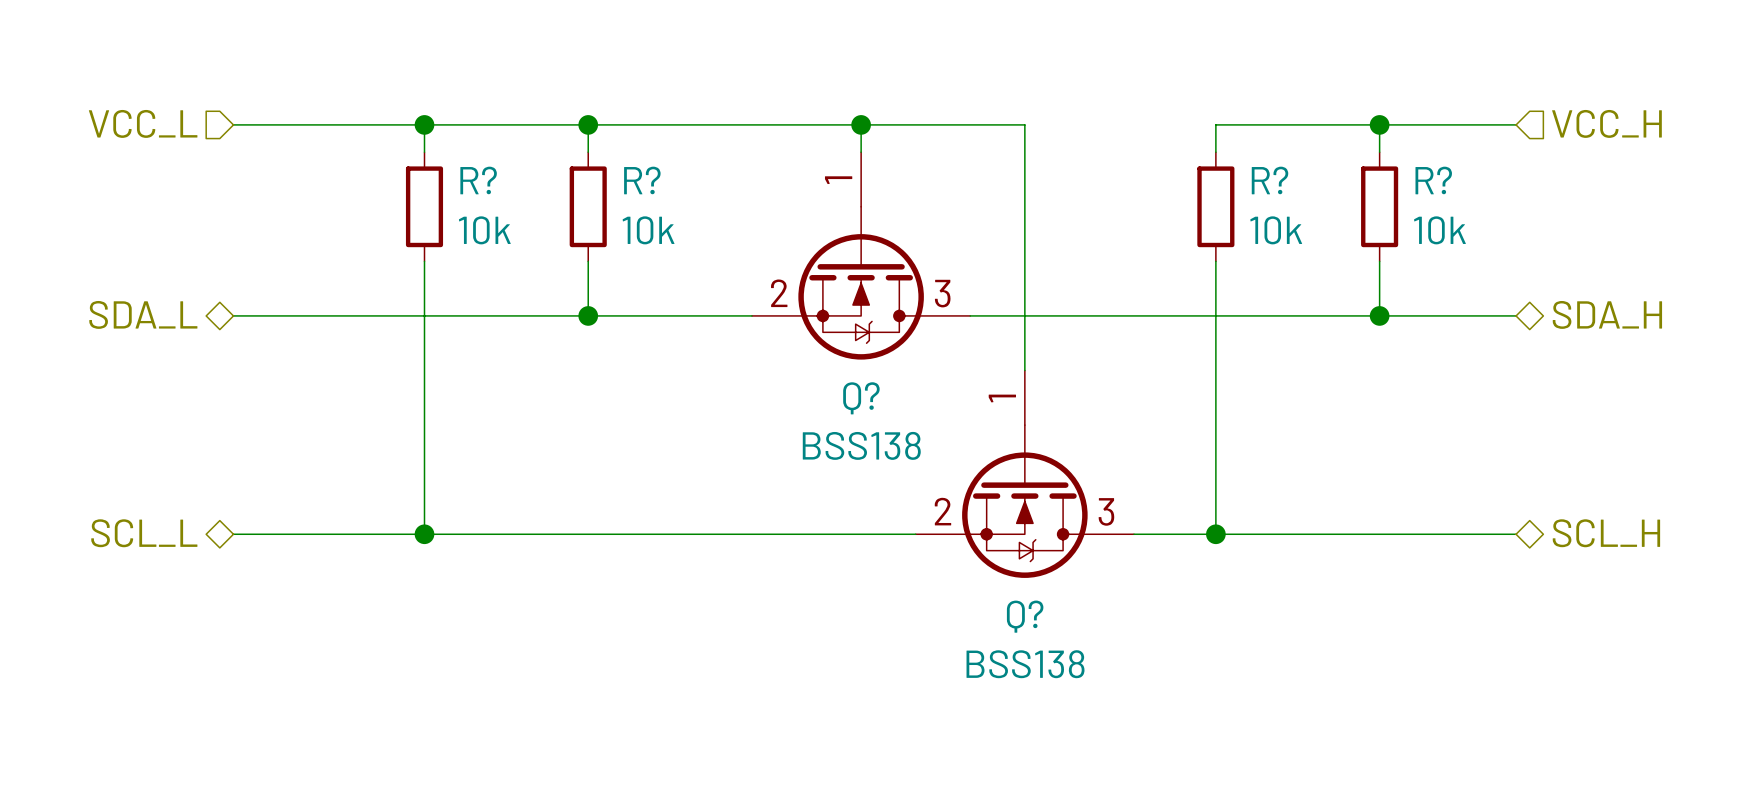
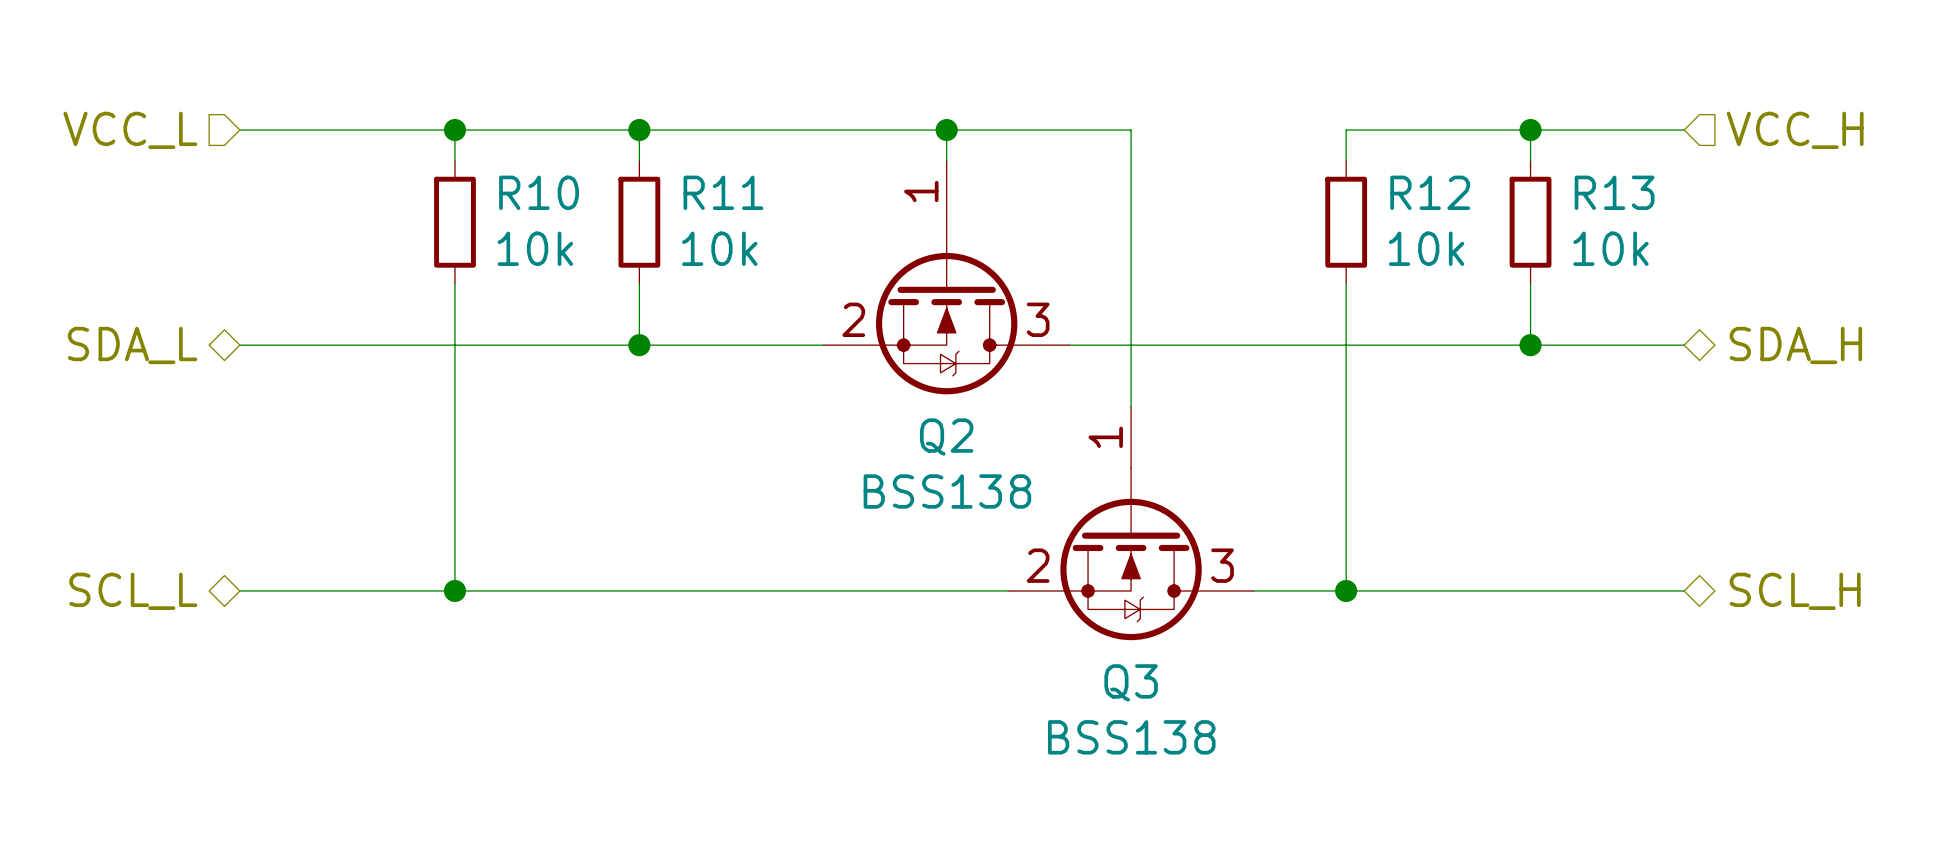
R? name: R? (478, 180) -> R10 (539, 192)
R? name: R? (642, 180) -> R11 (723, 192)
R? name: R? (1270, 180) -> R12 (1430, 192)
R? name: R? (1433, 180) -> R13 (1614, 192)
Q? name: Q? (861, 398) -> Q2 (946, 437)
Q? name: Q? (1025, 616) -> Q3 (1131, 682)

